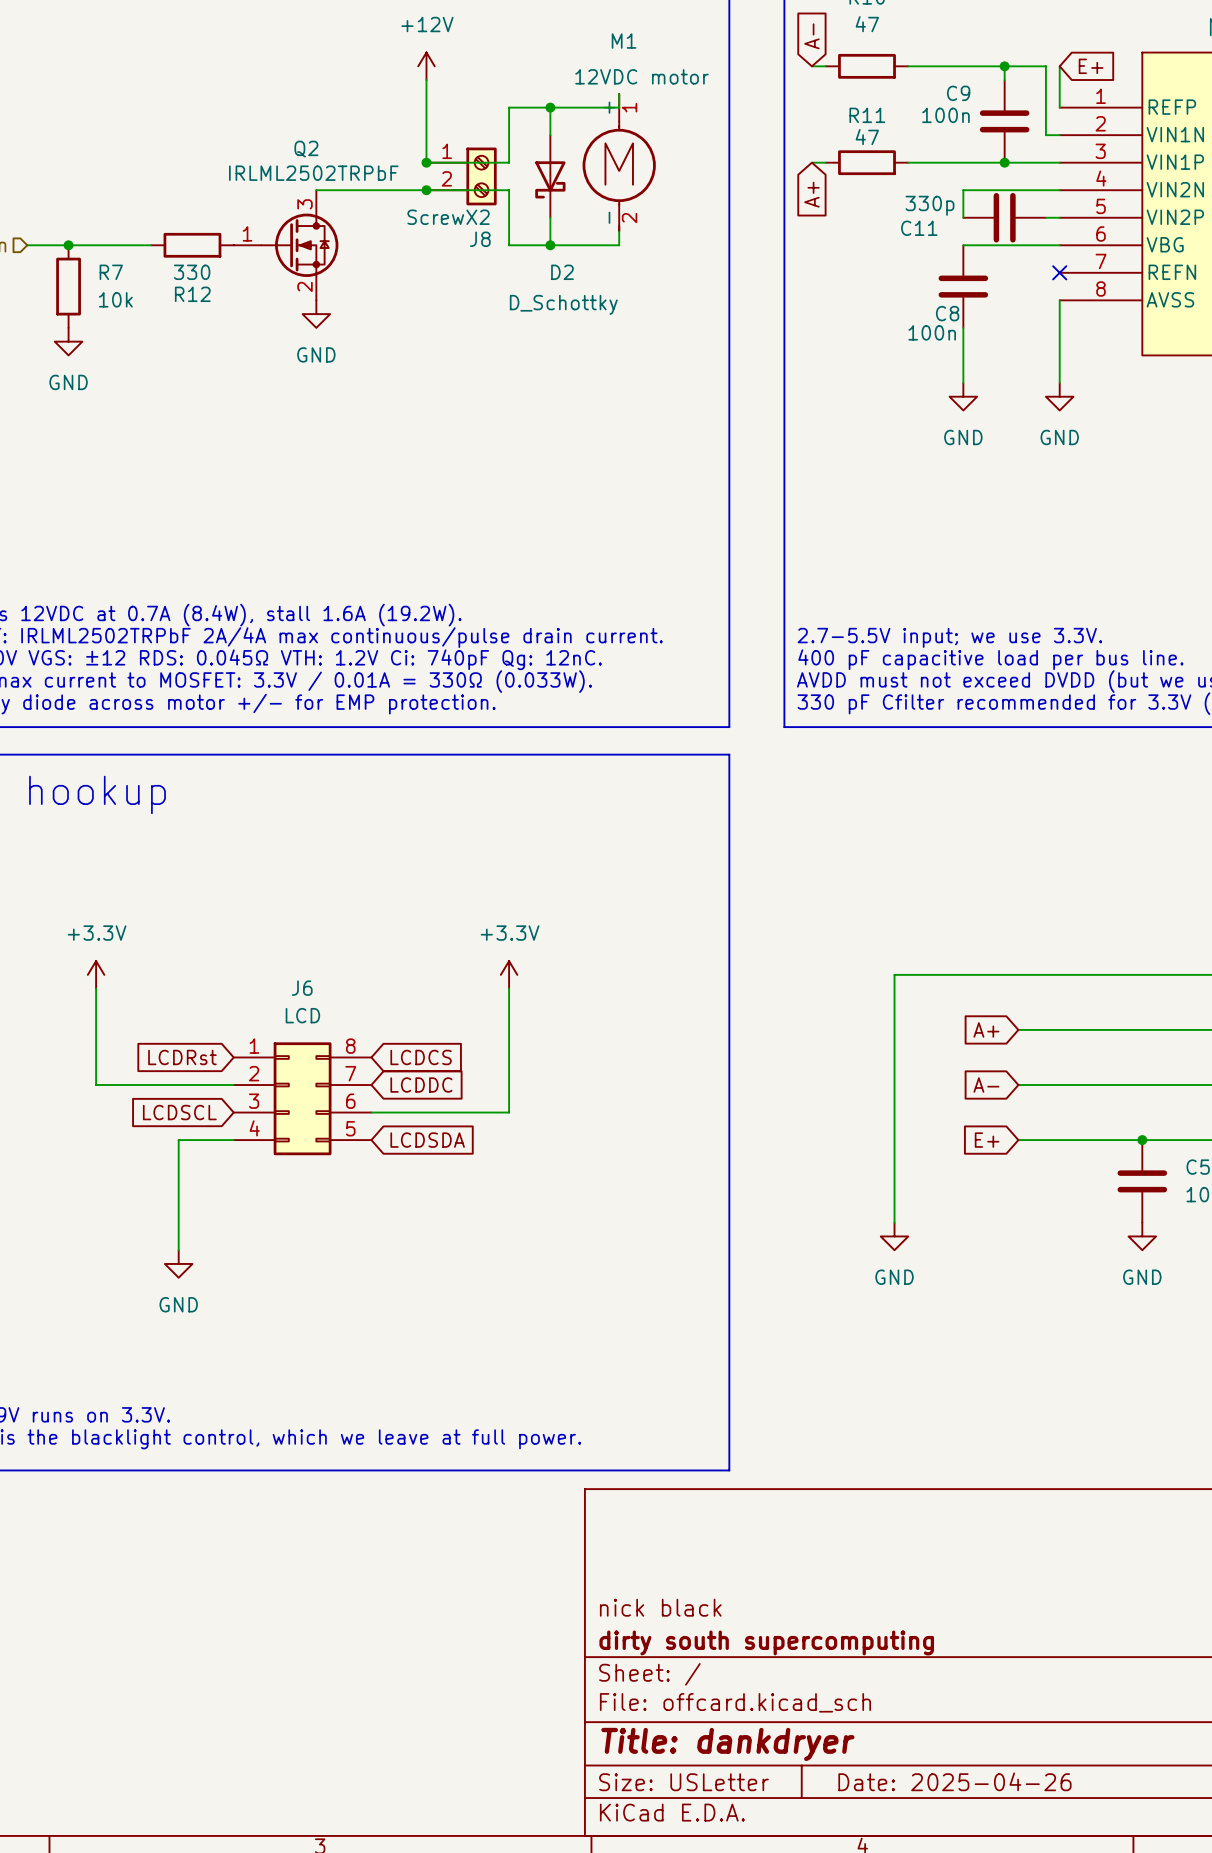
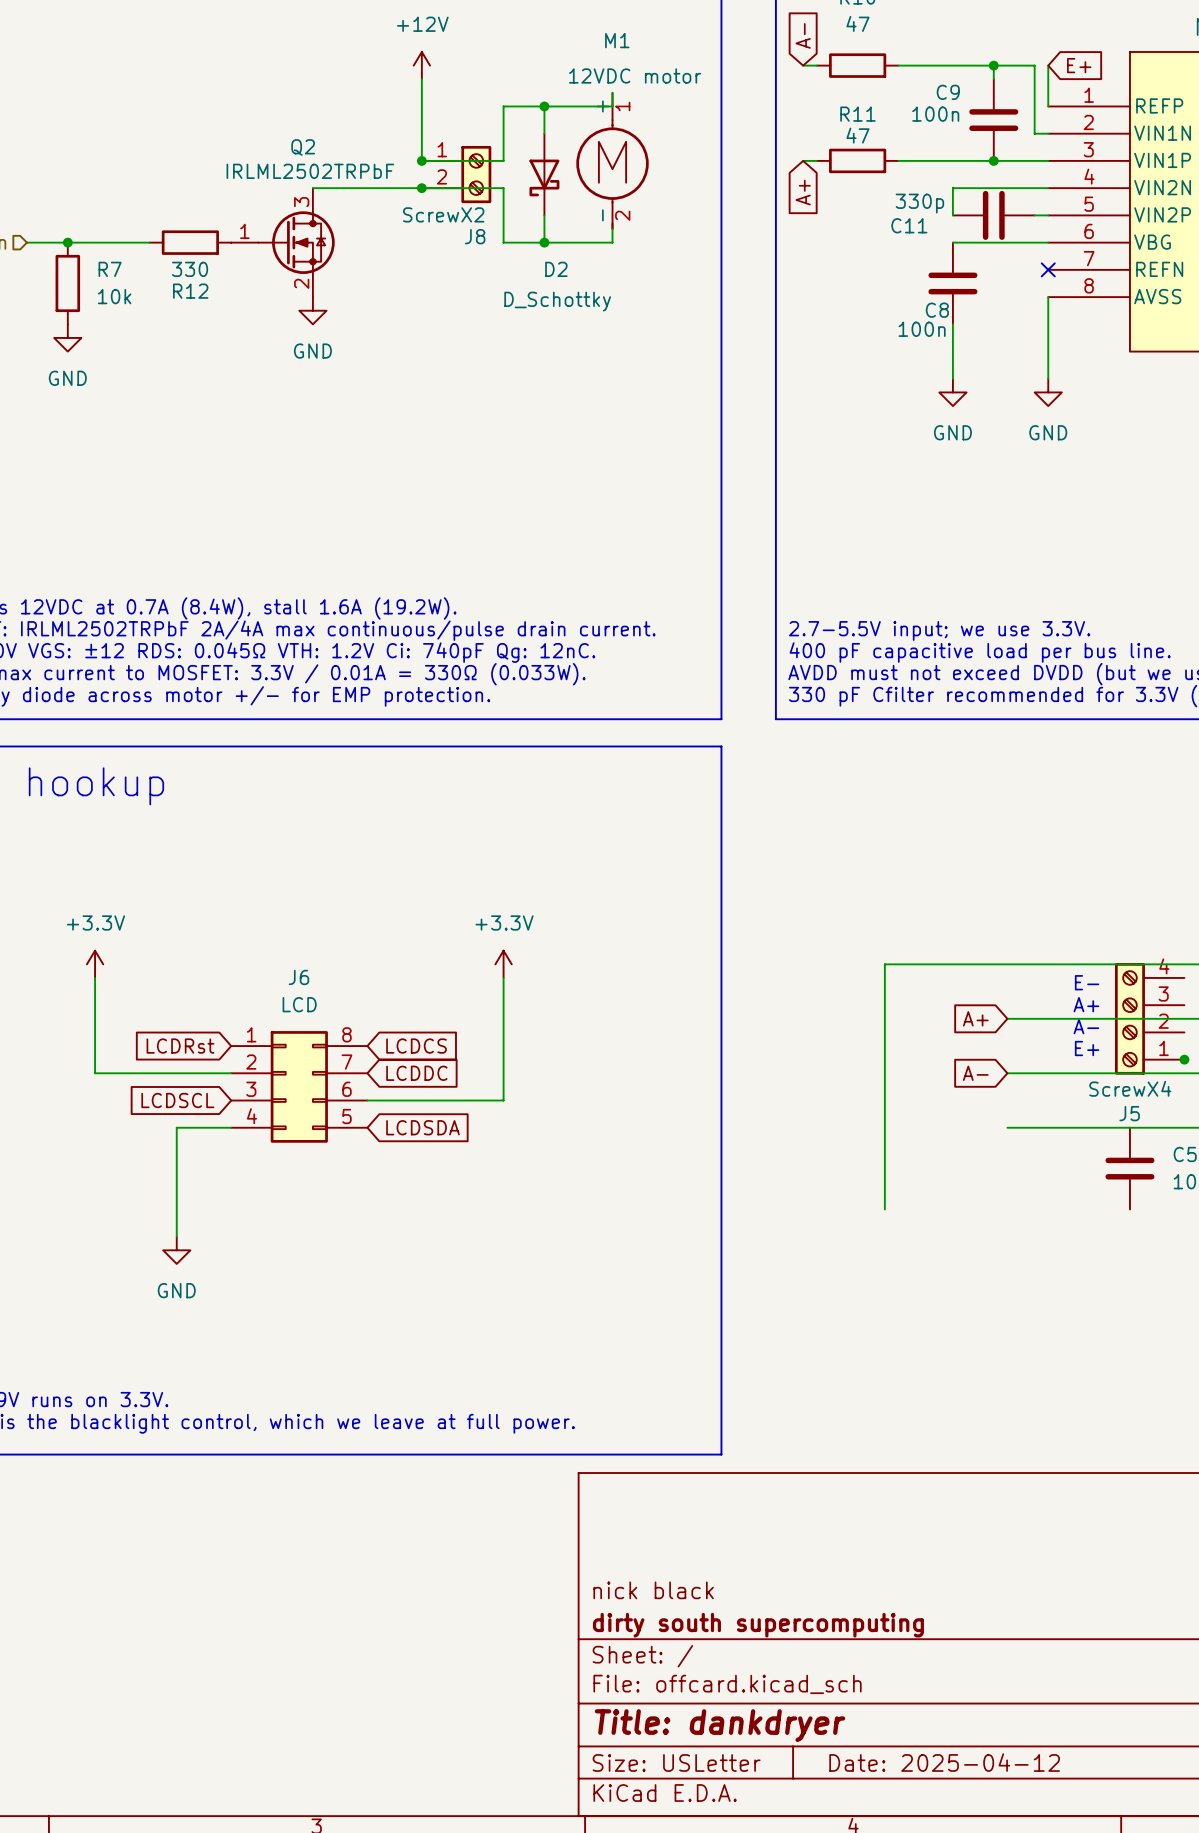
text: none -> E- (1087, 982)
text: none -> A+ (1086, 1004)
J5: none -> ScrewX4 (1149, 1018)
text: none -> A- (1086, 1026)
text: none -> E+ (1087, 1048)
junction: none -> (1184, 1059)
global label: E+ (987, 1140) -> none
junction: (1142, 1140) -> none
power symbol: GND (894, 1236) -> none
power symbol: GND (1142, 1236) -> none
title block: Date: 2025-04-26 (954, 1781) -> Date: 2025-04-12 (944, 1762)

